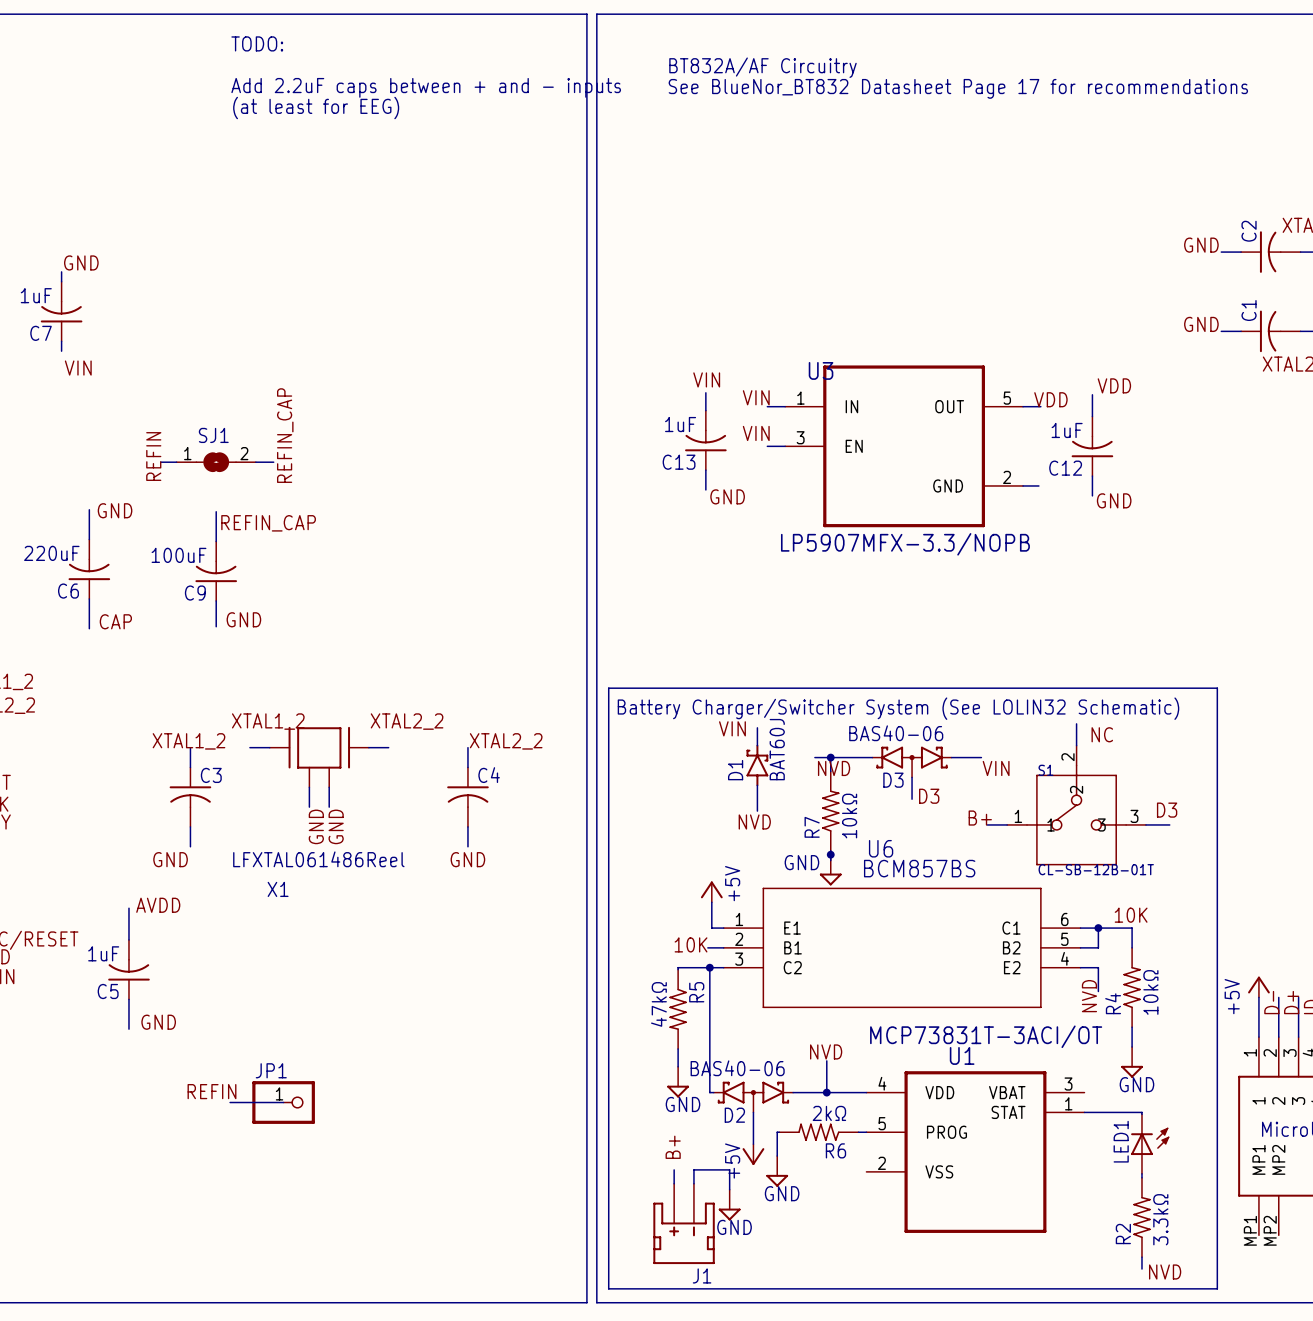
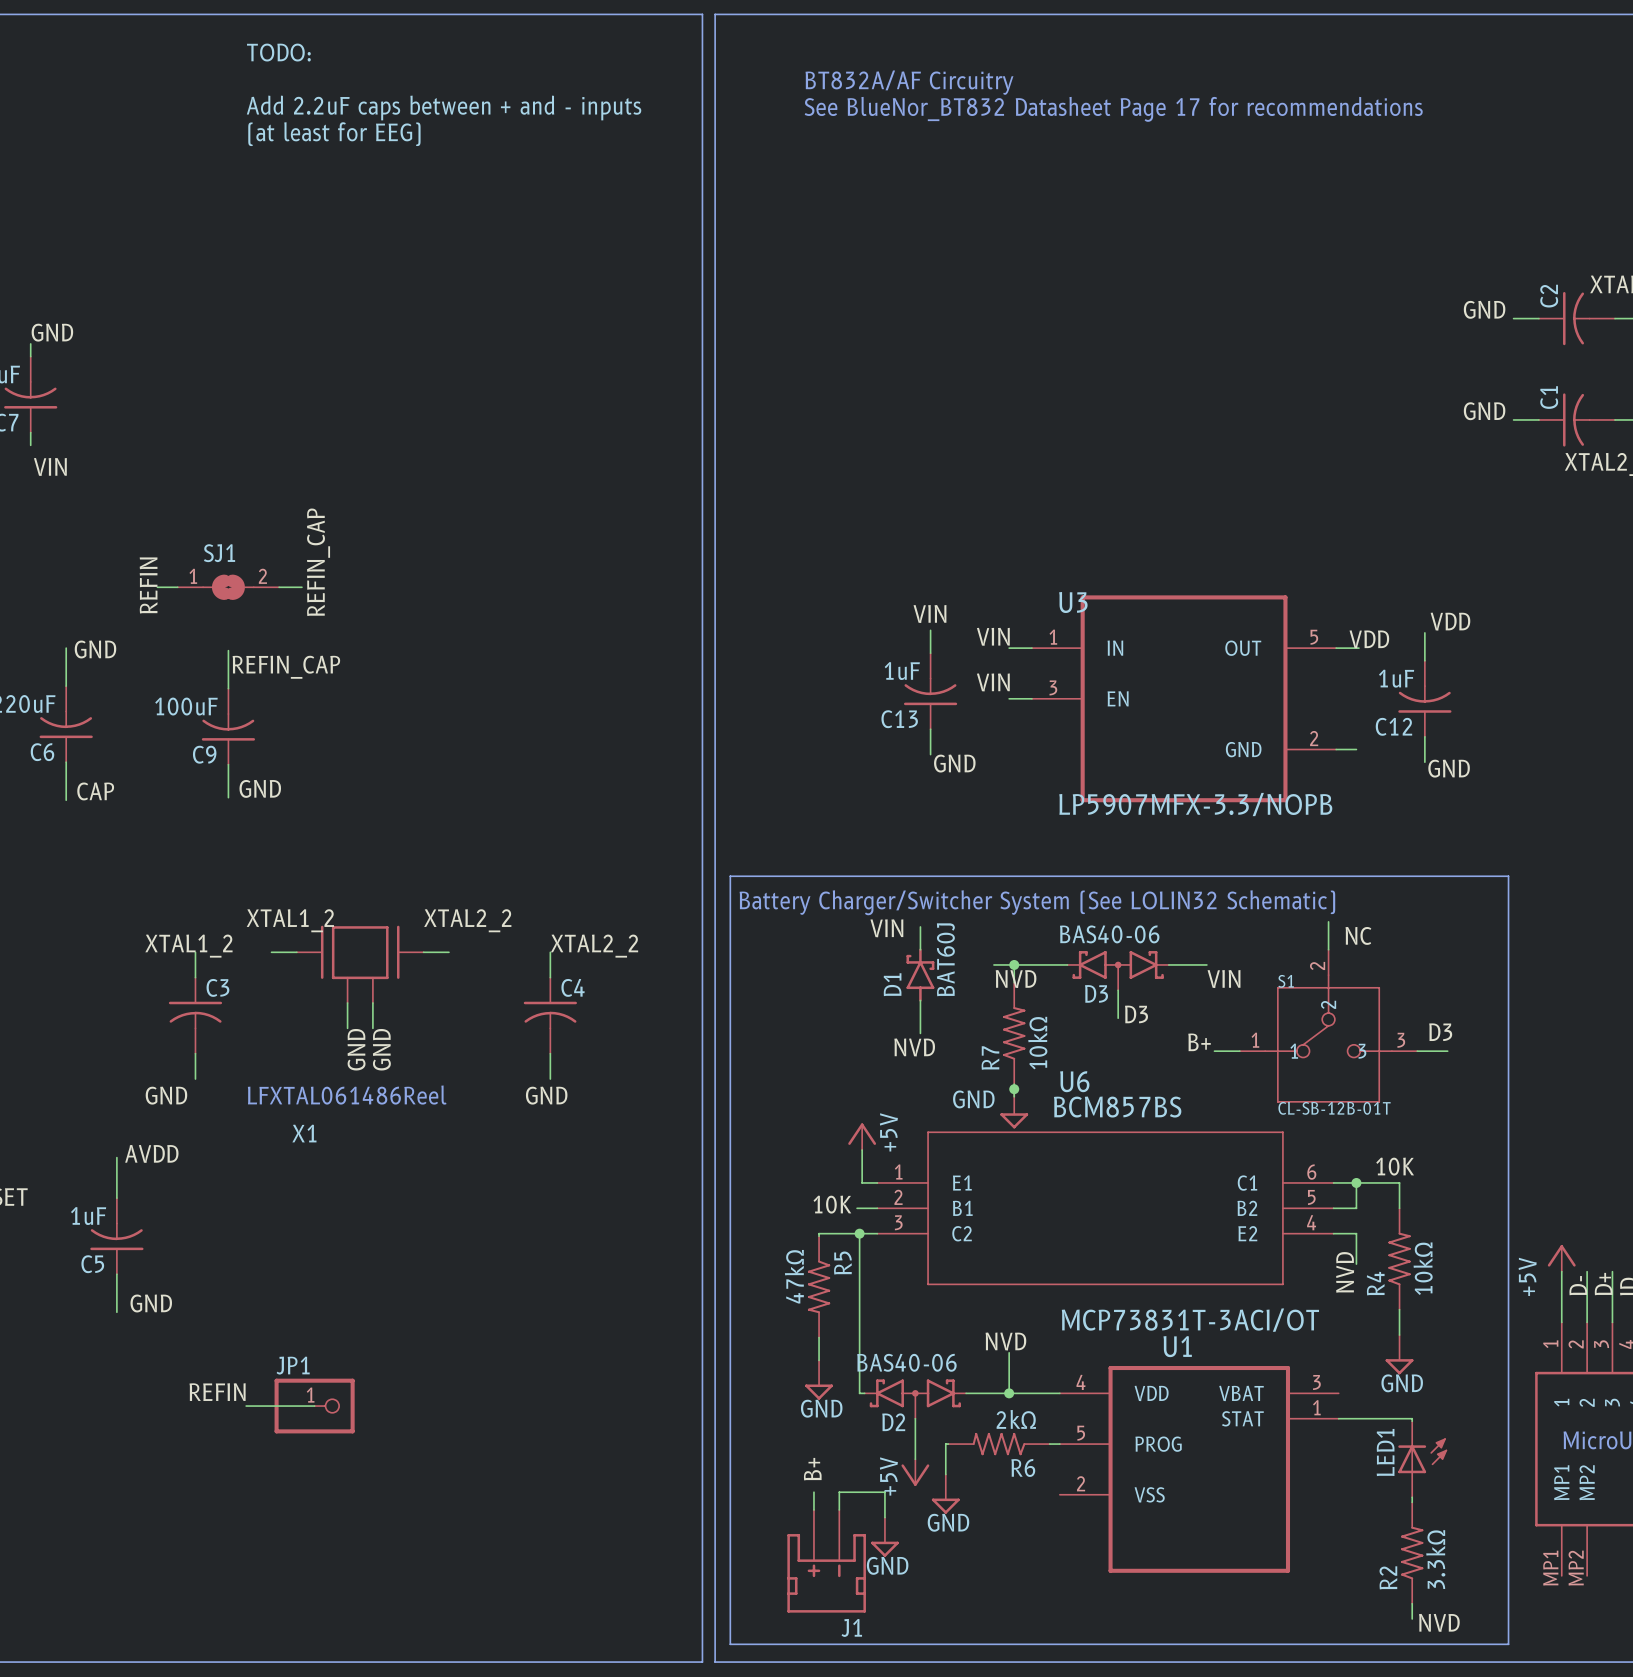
label: VIN (706, 379) -> none
label: VDD (1114, 385) -> none
wire: (705, 392) (705, 410) -> (930, 630) (930, 653)
wire: (1092, 394) (1092, 416) -> (1424, 632) (1424, 660)
label: VIN (756, 397) -> none
label: VDD (1050, 399) -> none
wire: (767, 406) (785, 406) -> (1009, 648) (1031, 648)
wire: (1023, 406) (1040, 406) -> (1336, 648) (1358, 648)
label: VIN (756, 433) -> none
C13 position: (705, 440) -> (930, 691)
wire: (767, 446) (785, 446) -> (1009, 698) (1031, 698)
U3 position: (904, 446) -> (1184, 698)
C12 position: (1092, 446) -> (1424, 698)
wire: (705, 470) (705, 489) -> (930, 729) (930, 754)
wire: (1092, 476) (1092, 495) -> (1424, 736) (1424, 762)
label: none -> VIN (929, 614)
wire: (1023, 485) (1038, 485) -> (1336, 749) (1356, 749)
label: none -> VDD (1450, 621)
label position: GND (727, 496) -> GND (954, 763)
label: none -> VIN (993, 636)
label position: GND (1114, 500) -> GND (1449, 768)
label: none -> VDD (1369, 639)
label: none -> VIN (993, 682)
U3 value position: LP5907MFX-3.3/NOPB (905, 544) -> LP5907MFX-3.3/NOPB (1195, 804)

